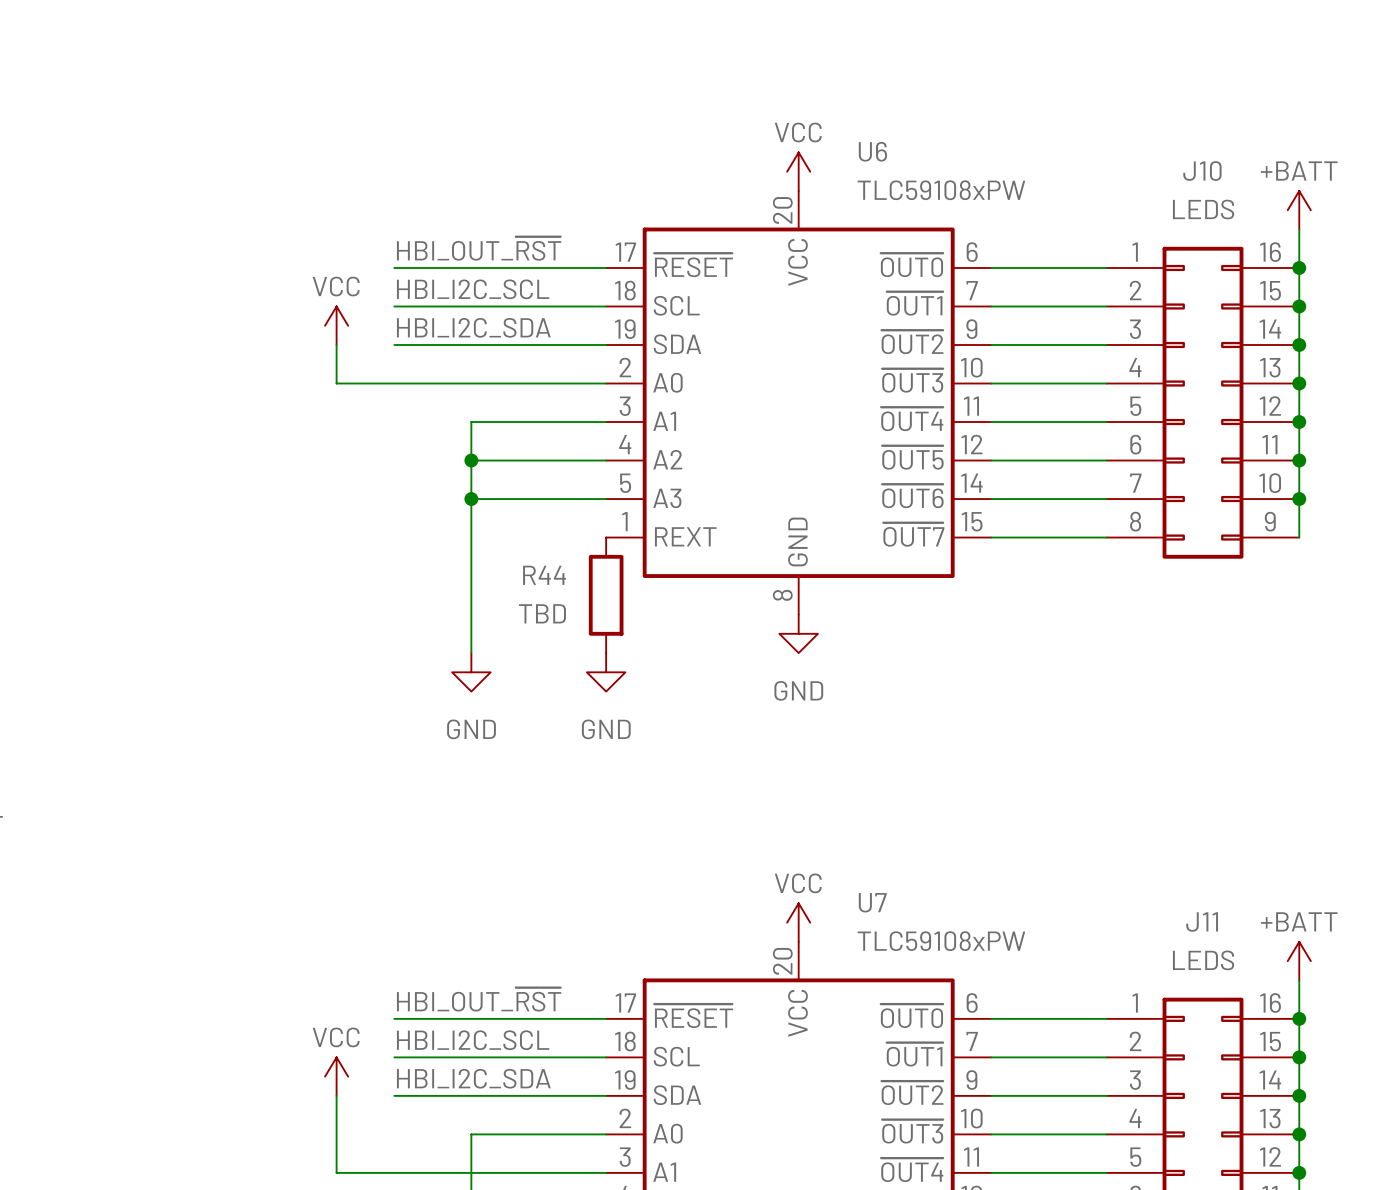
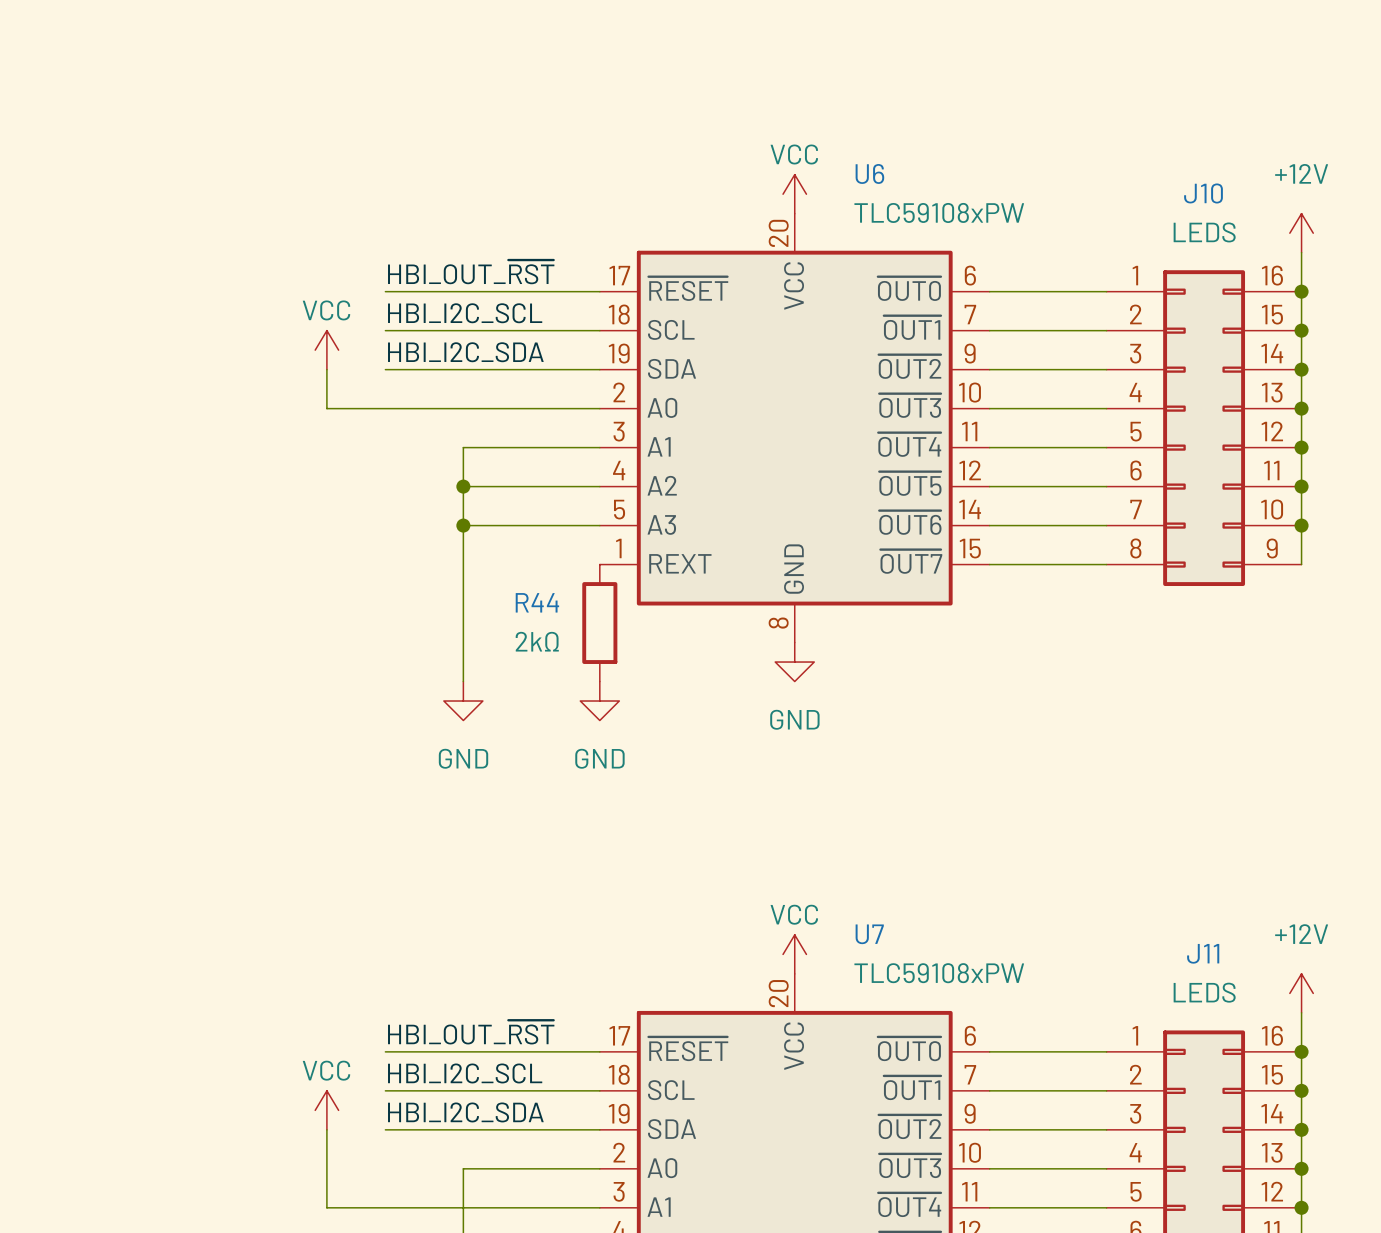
power symbol: +BATT (1299, 210) -> +12V (1301, 233)
R44 value: TBD (542, 613) -> 2kΩ (537, 641)
power symbol: +BATT (1299, 961) -> +12V (1301, 993)

